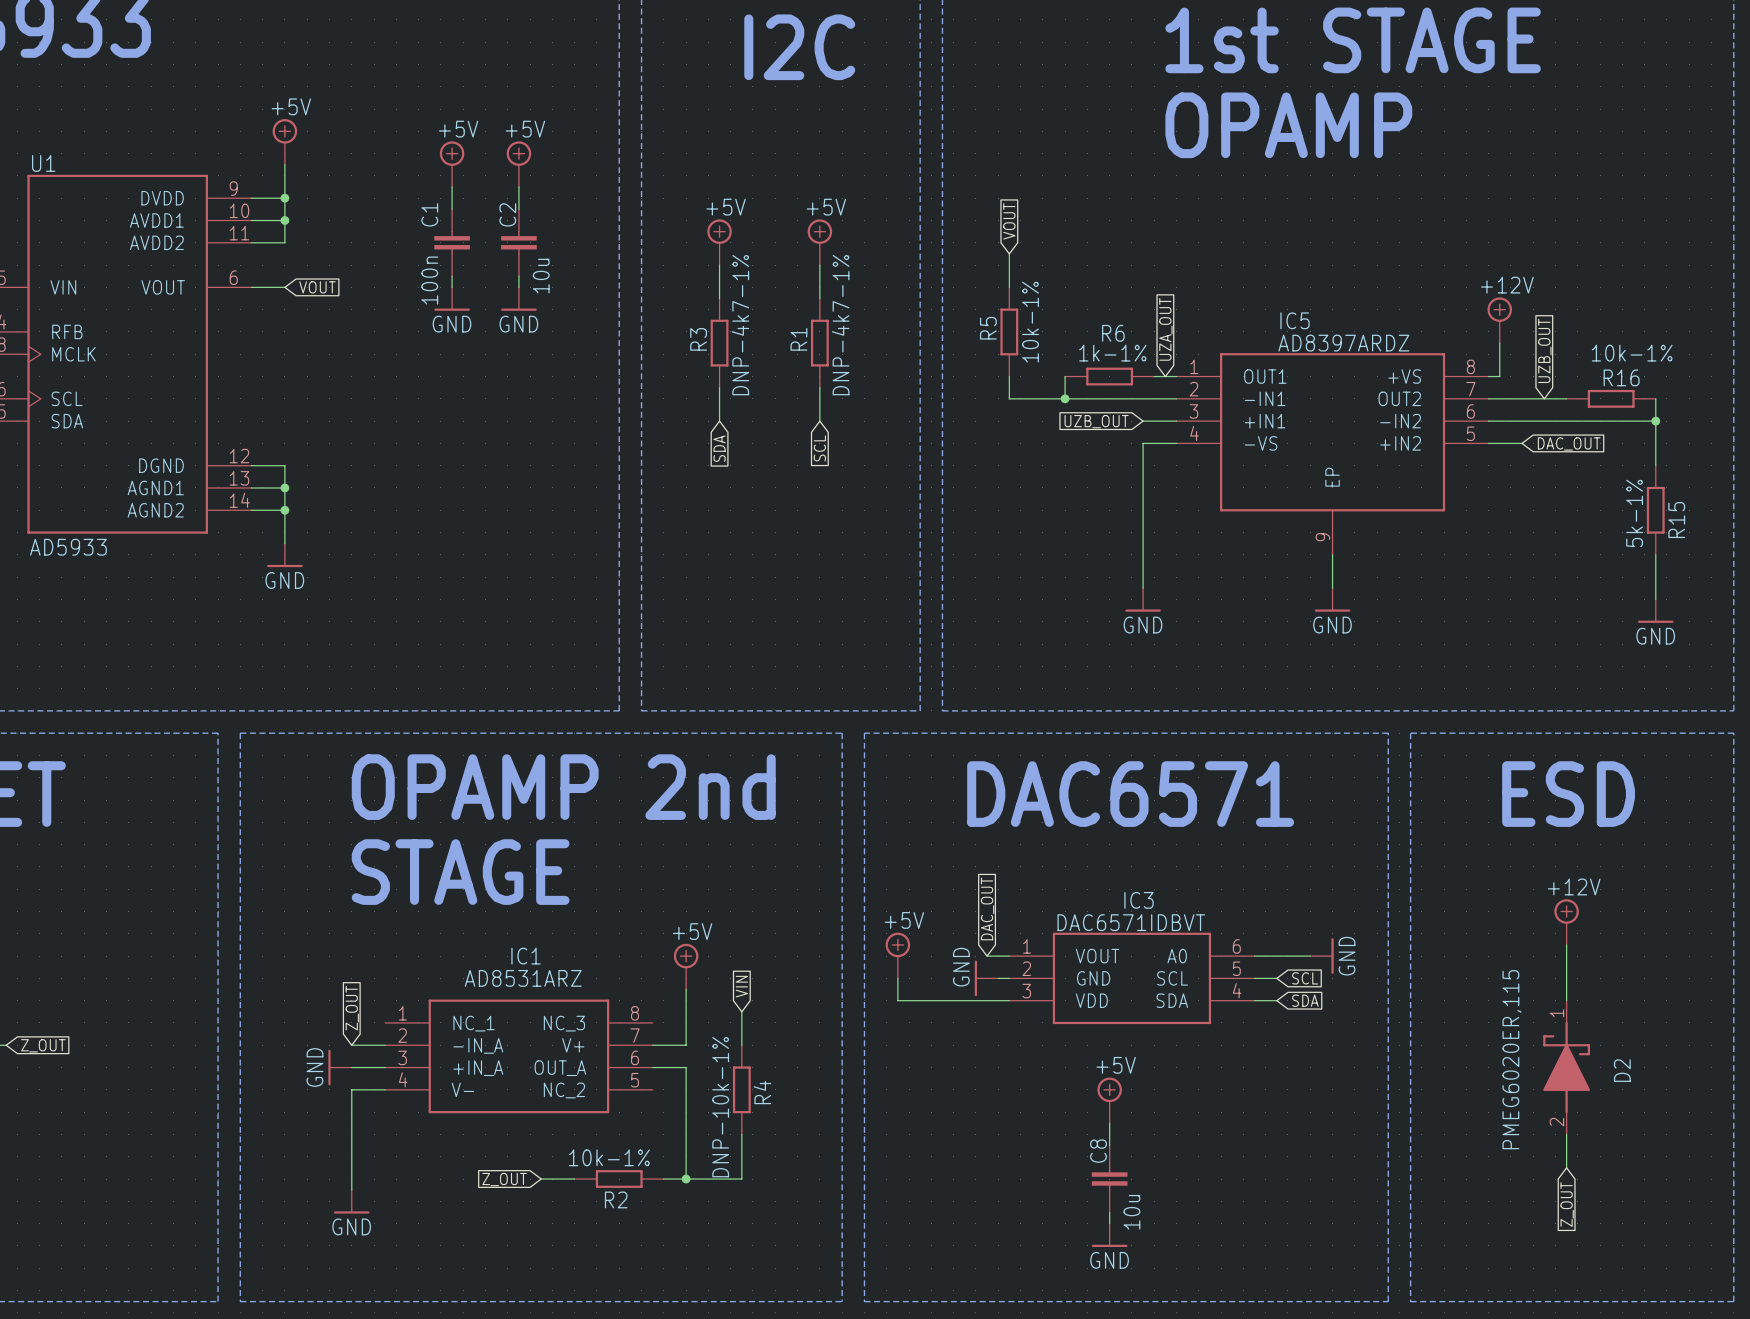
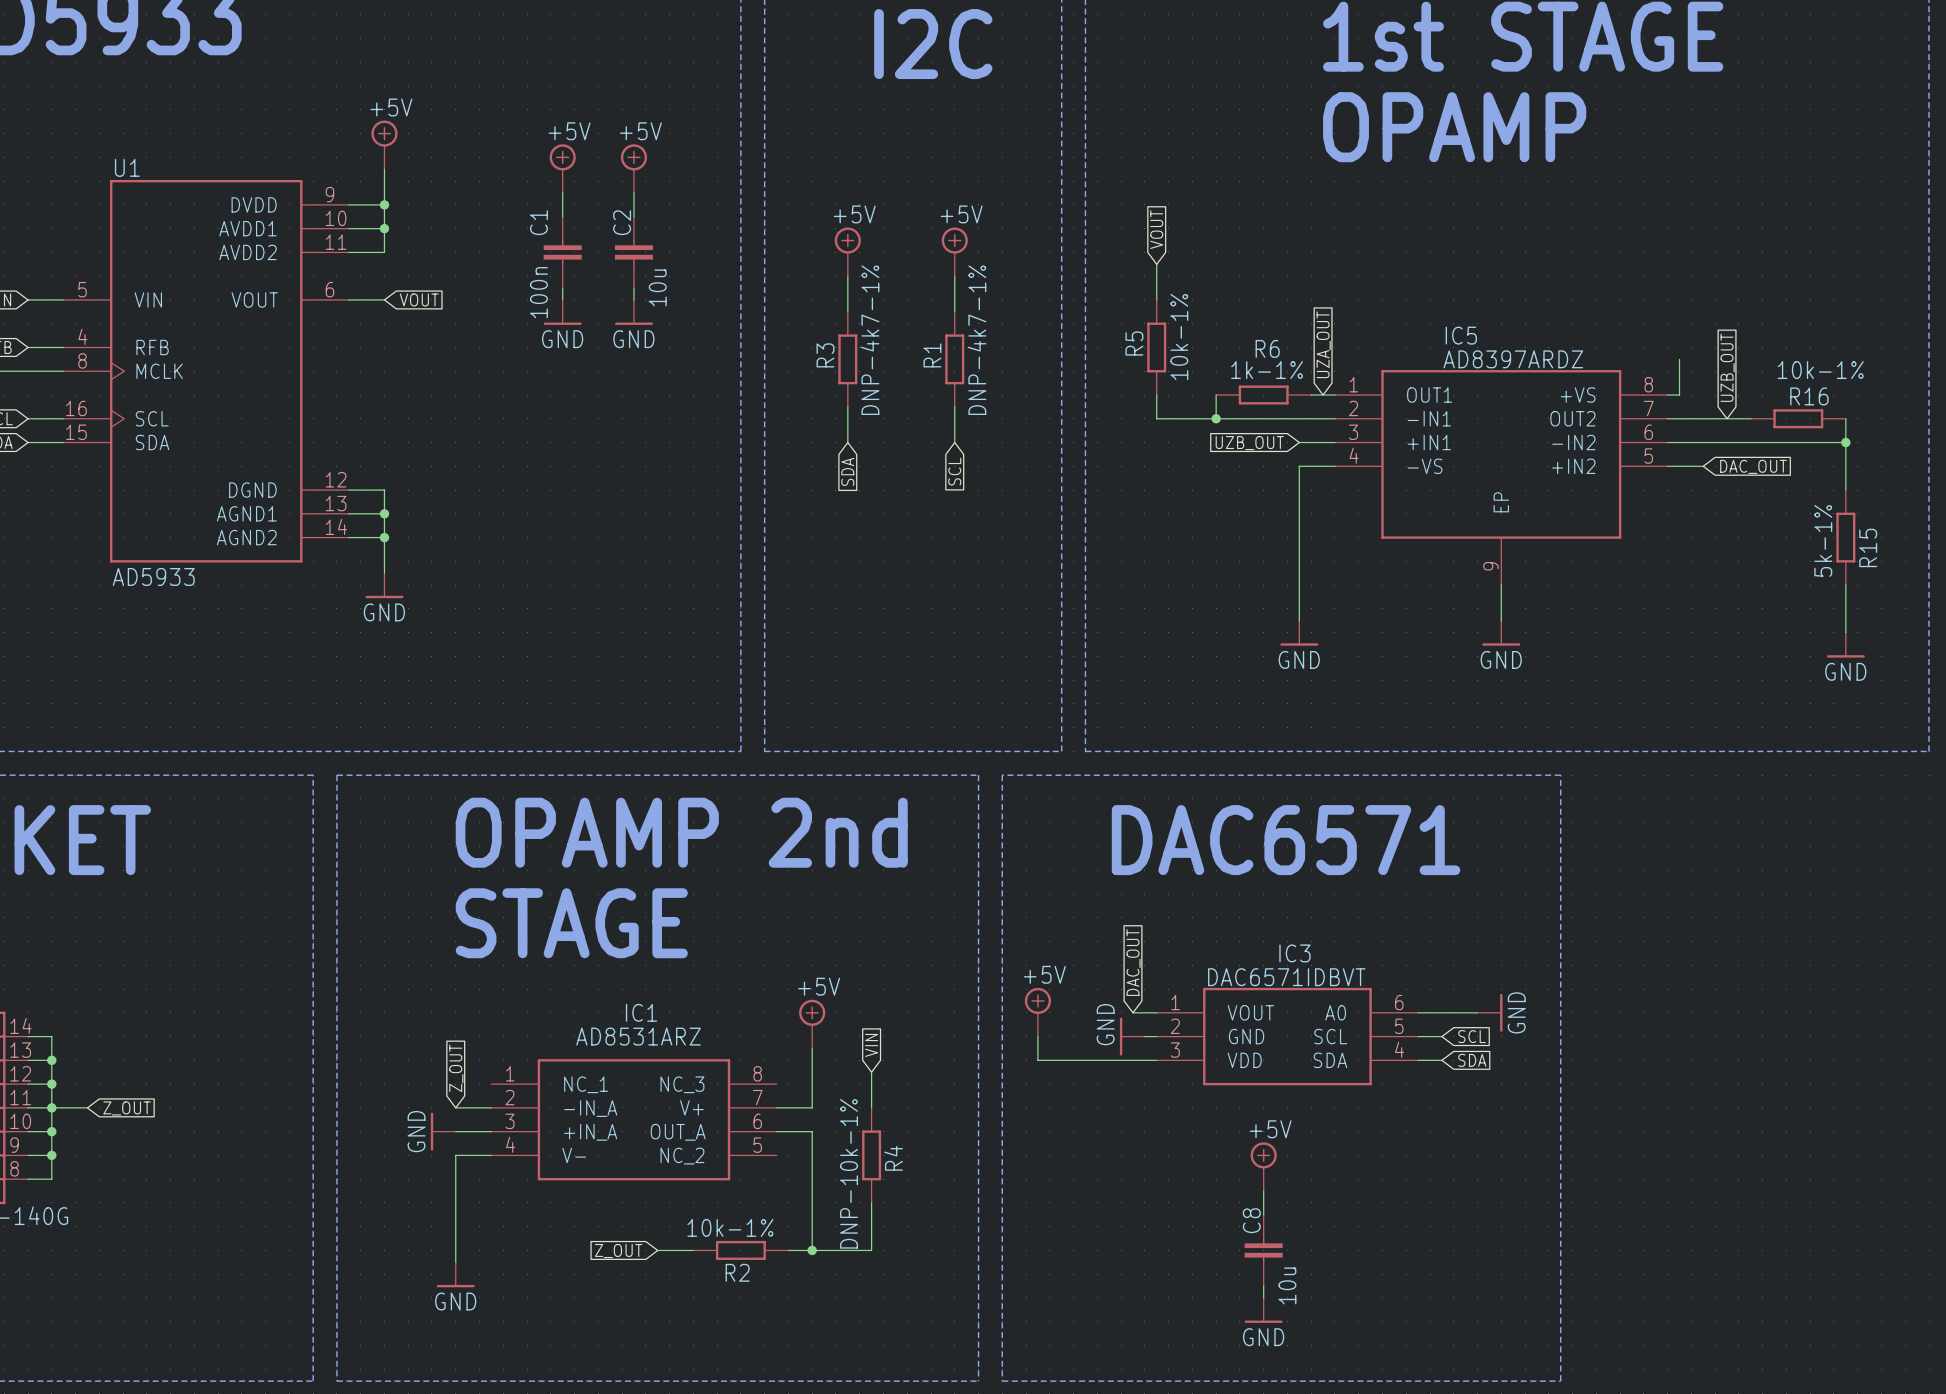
power symbol: +12V (1499, 320) -> none
line: (1410, 733) (1410, 1301) (1733, 1301) (1733, 733) (1410, 733) -> none
text: ESD (1568, 794) -> none
power symbol: +12V (1566, 922) -> none
wire: (1566, 944) (1566, 1000) -> none
D2: PMEG6020ER,115 (1566, 1067) -> none
wire: (1566, 1134) (1566, 1167) -> none
global label: Z_OUT (1567, 1204) -> none

